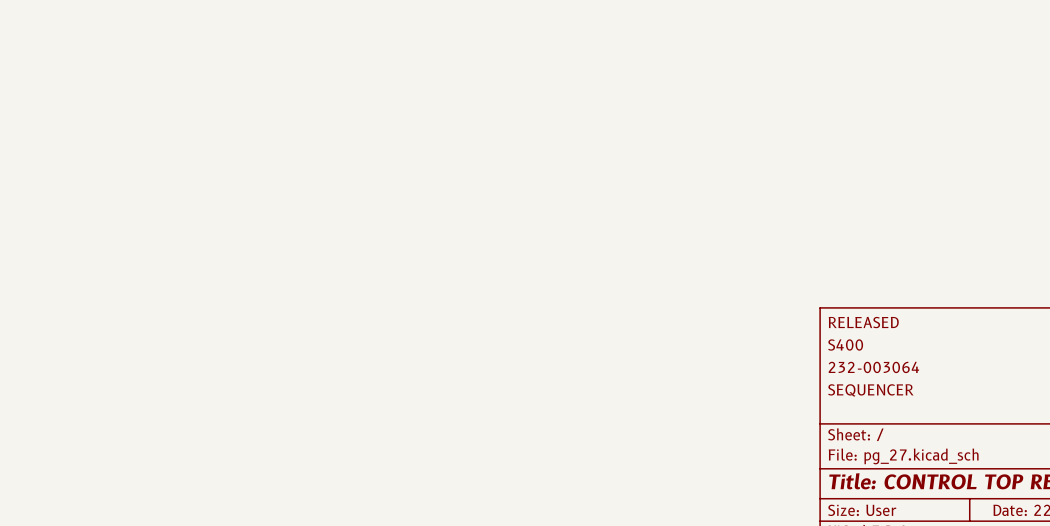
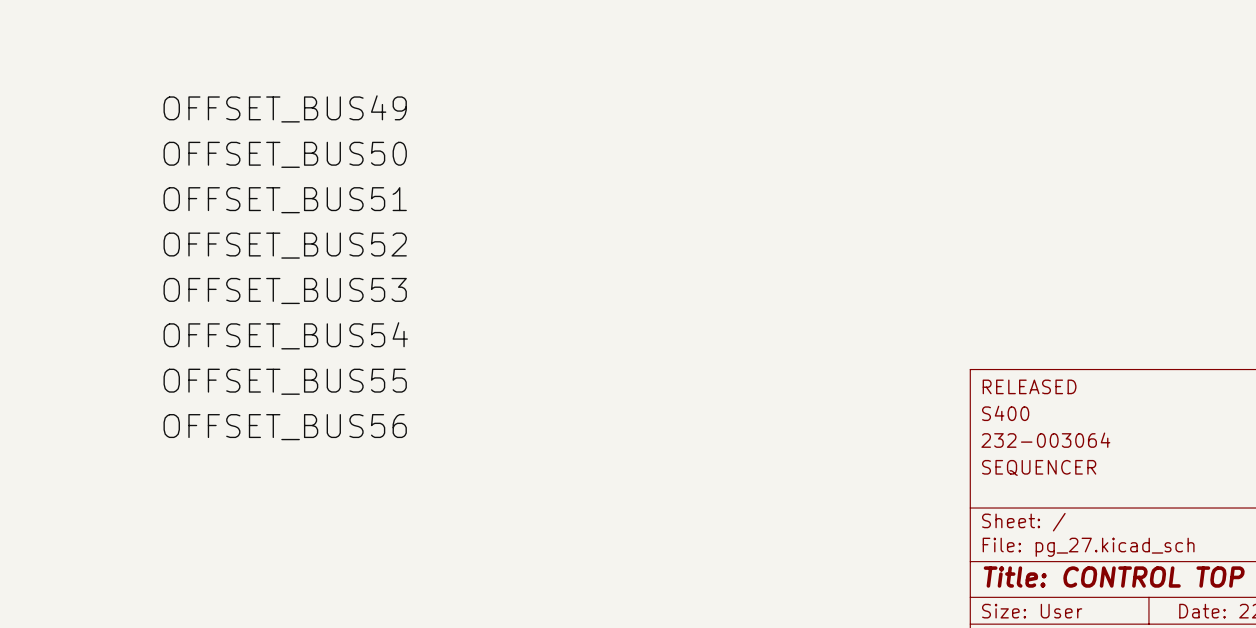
label: none -> OFFSET_BUS49 (285, 108)
label: none -> OFFSET_BUS50 (285, 154)
label: none -> OFFSET_BUS51 (285, 200)
label: none -> OFFSET_BUS52 (285, 245)
label: none -> OFFSET_BUS53 (285, 290)
label: none -> OFFSET_BUS54 (285, 335)
label: none -> OFFSET_BUS55 (285, 381)
label: none -> OFFSET_BUS56 (285, 427)

